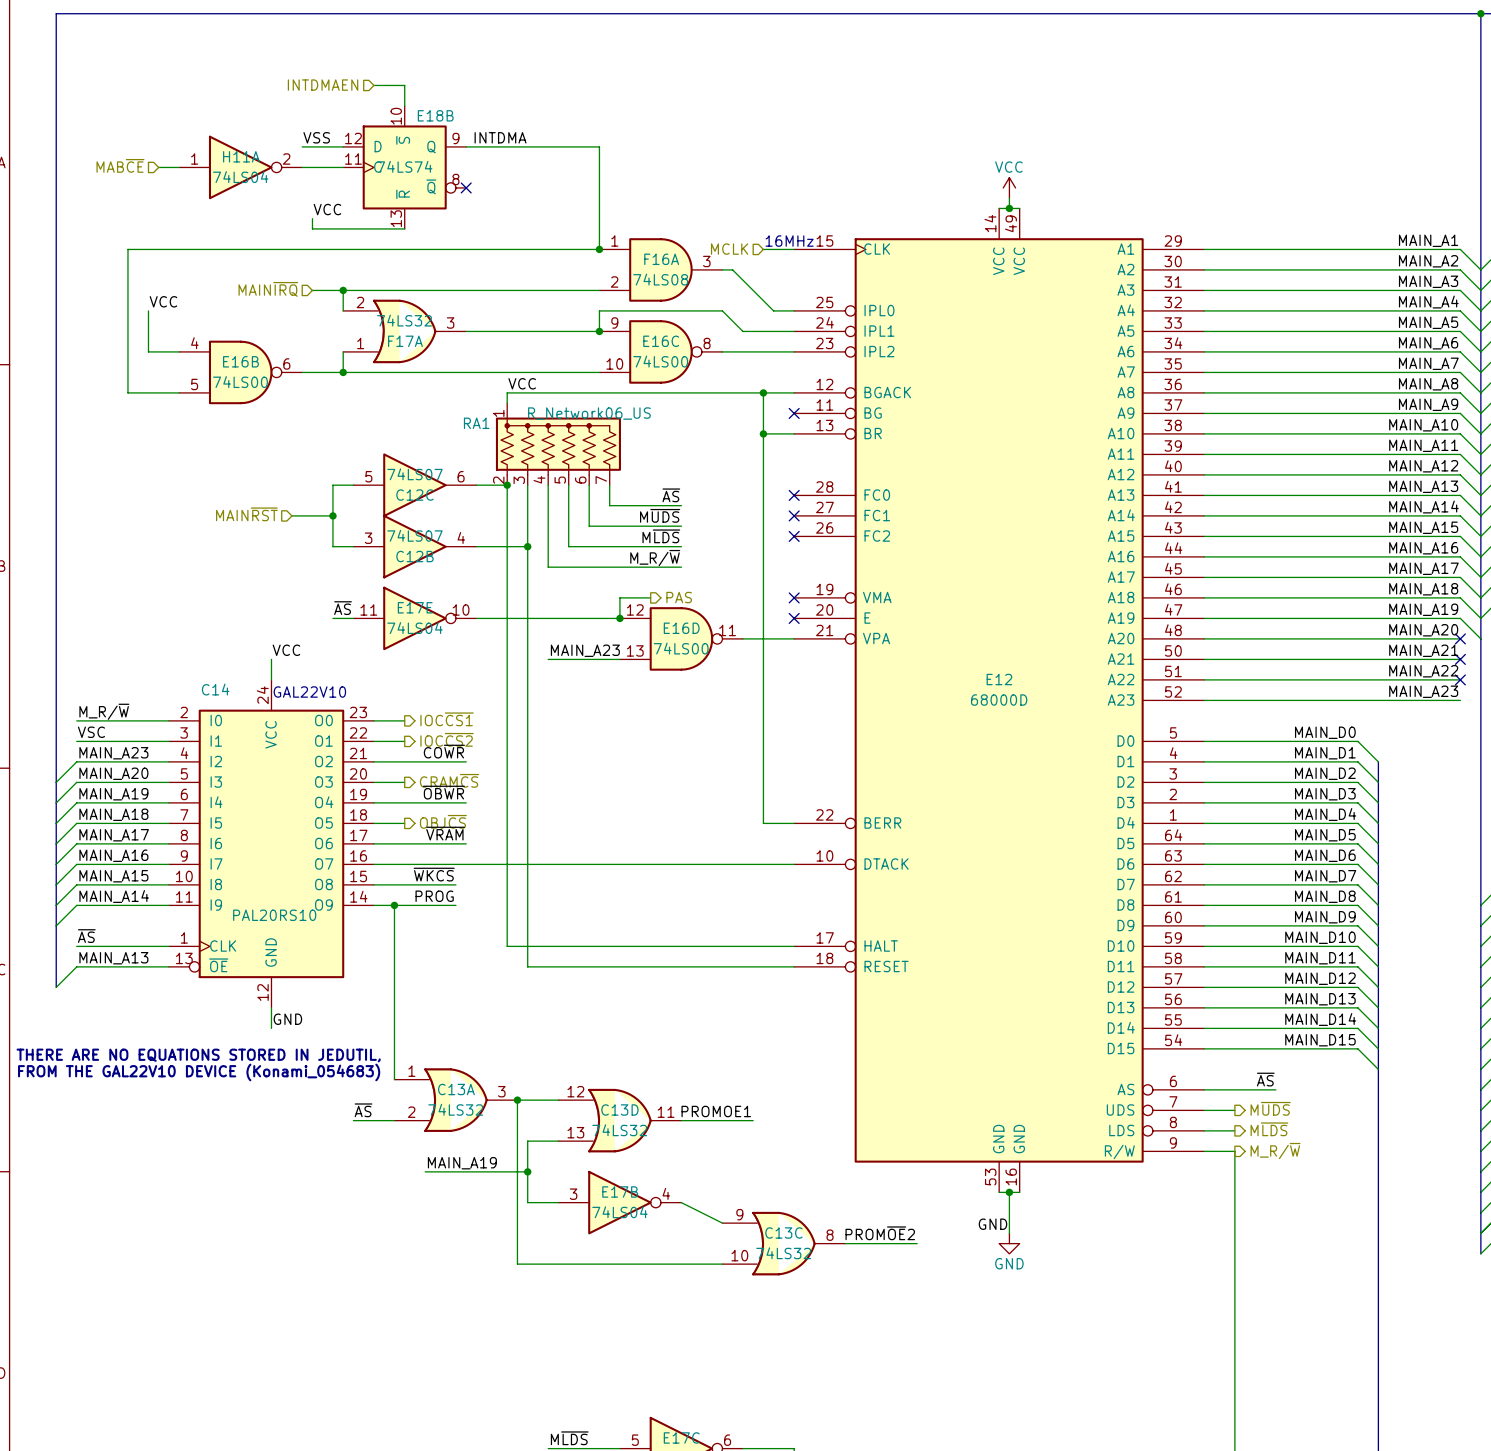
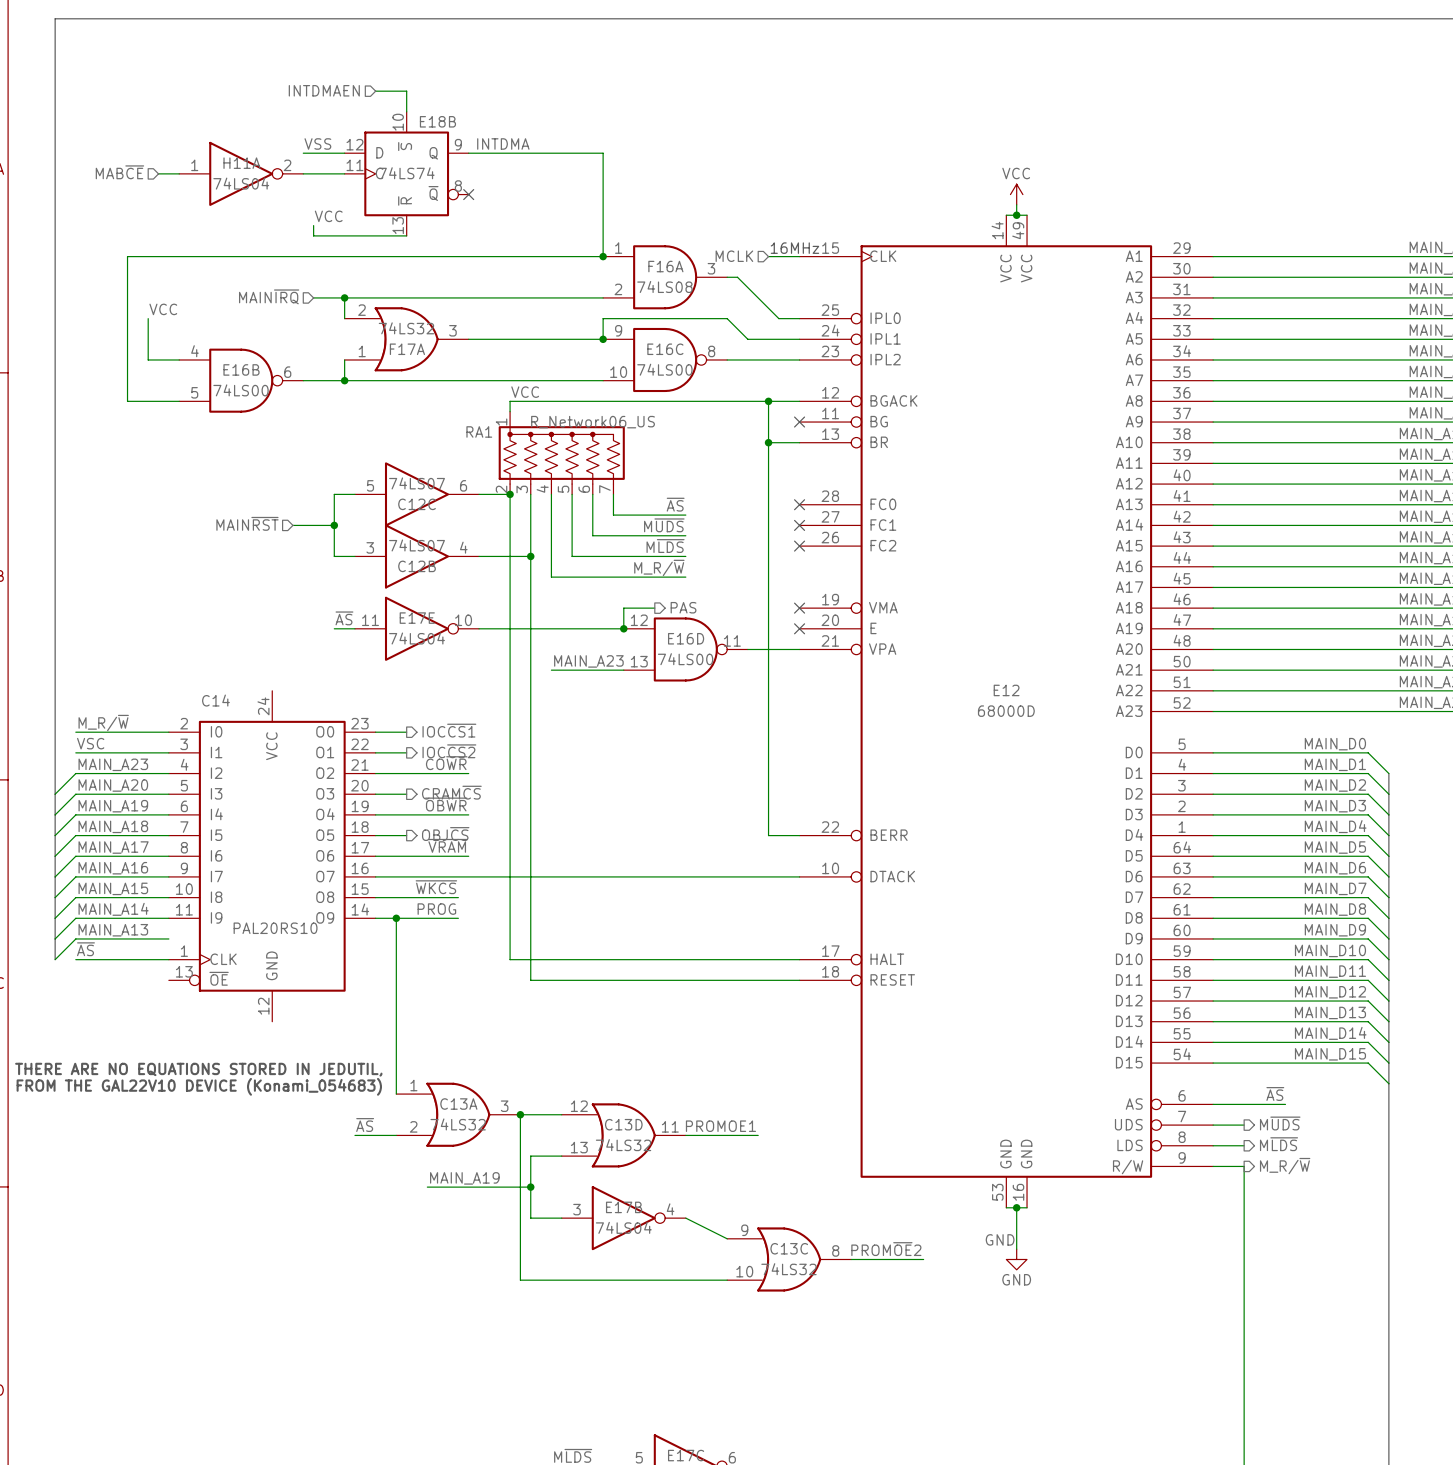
label: VCC (286, 650) -> none
wire: (271, 659) (271, 679) -> none
text: GAL22V10 (309, 692) -> none
bus: (56, 946) (56, 987) -> none
label position: MAIN_A13 (113, 958) -> MAIN_A13 (113, 930)
wire: (168, 966) (76, 966) (56, 987) -> (168, 938) (75, 938) (55, 959)
wire: (271, 1007) (271, 1028) -> none
label: GND (287, 1019) -> none

